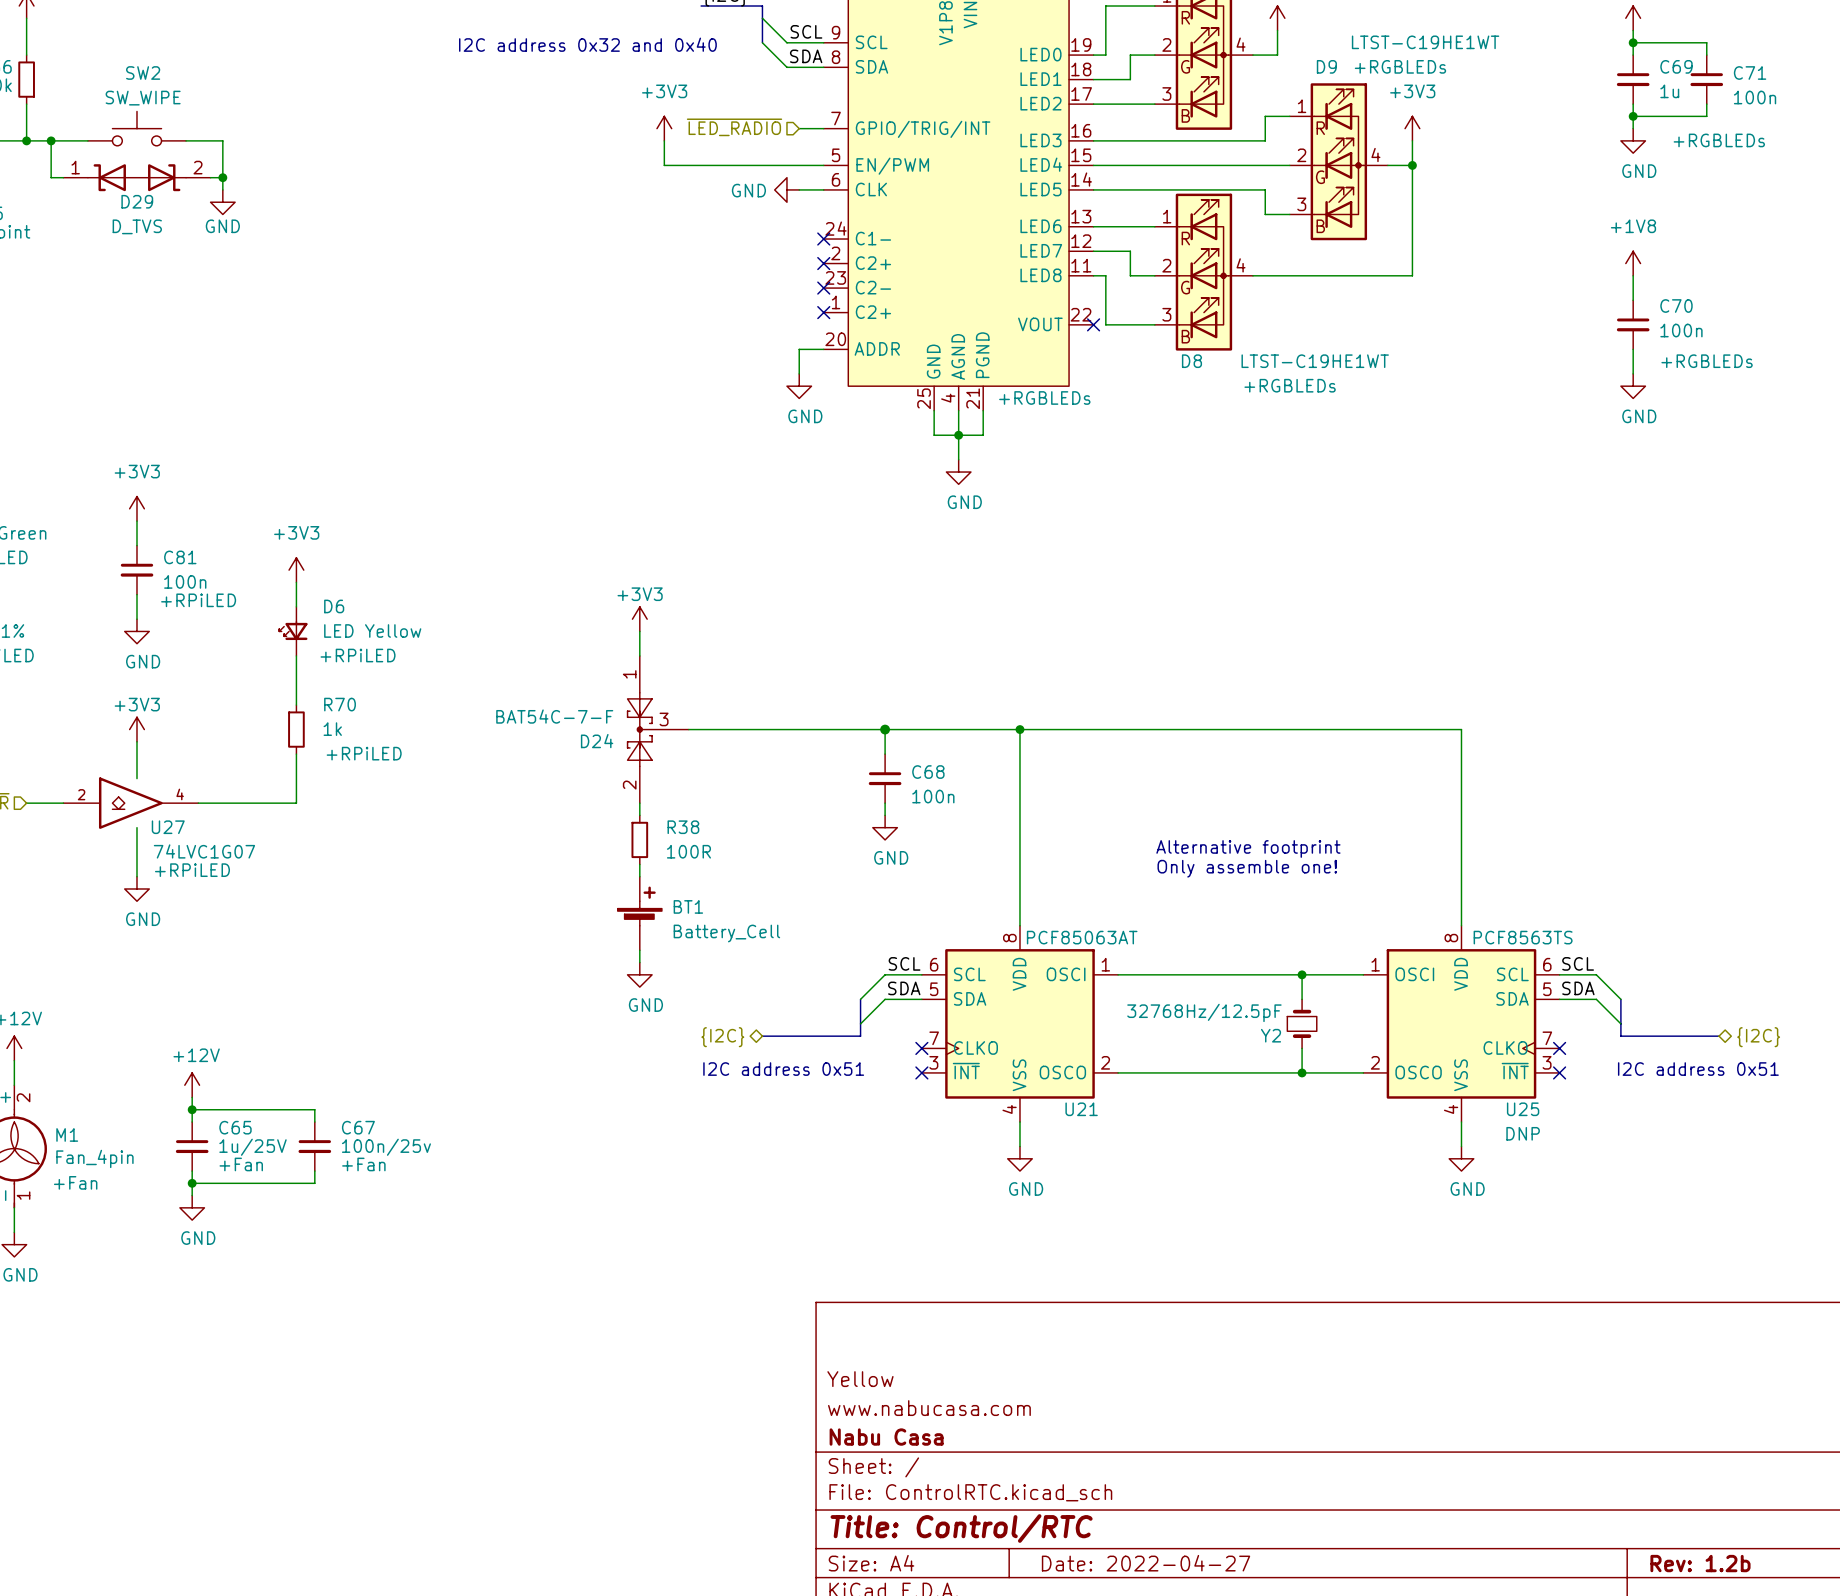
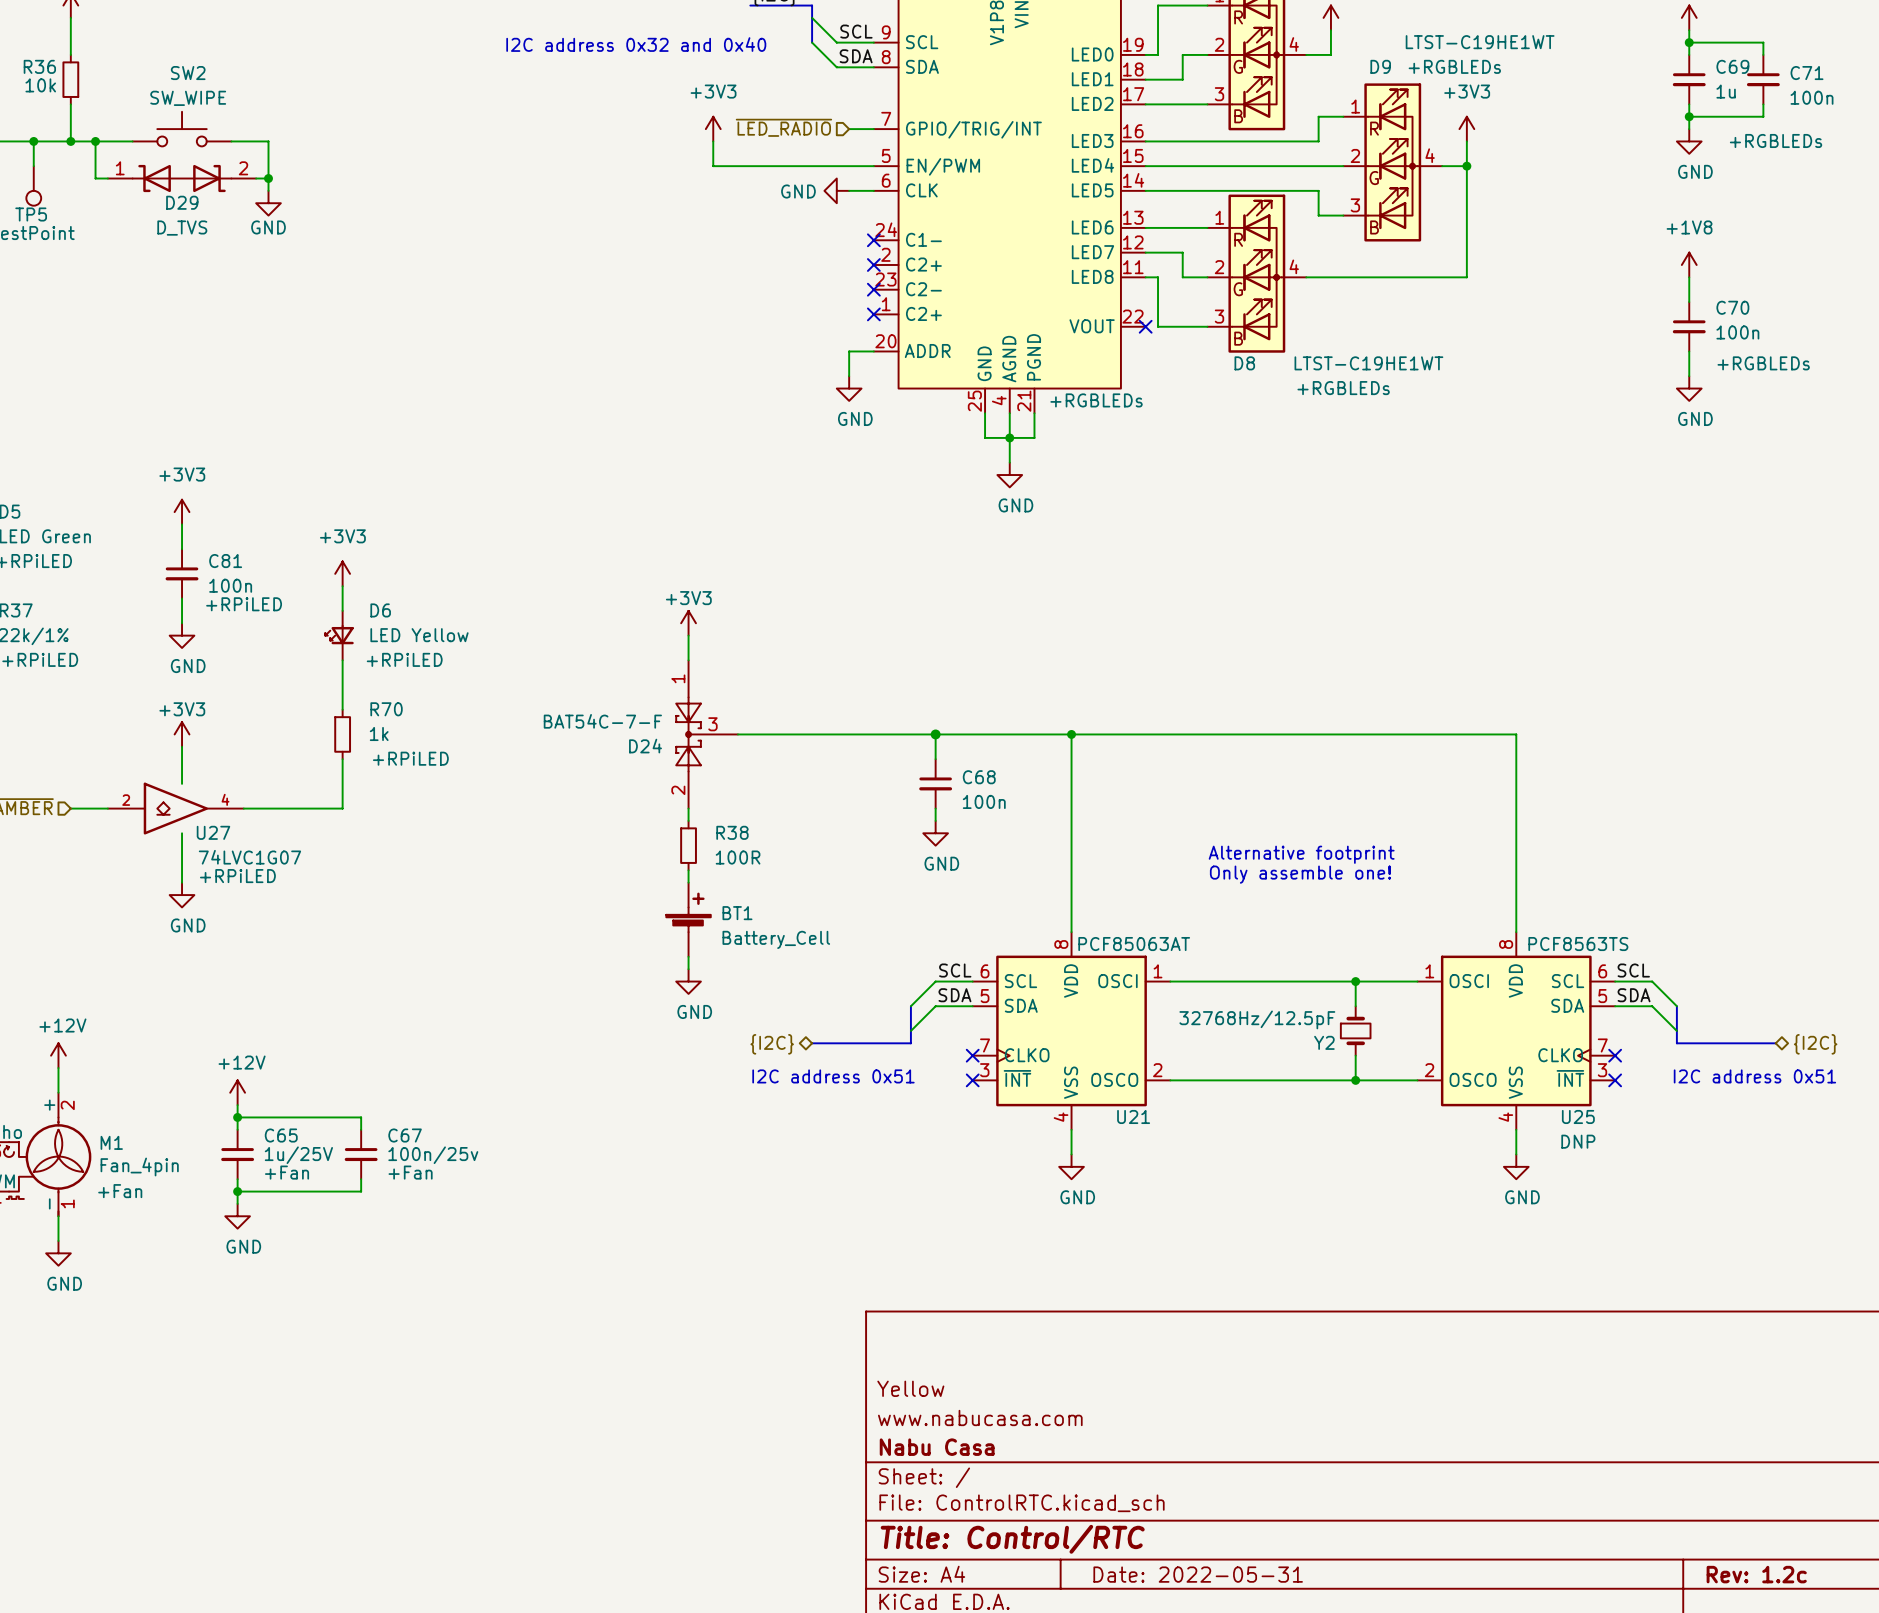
title block: Date: 2022-04-27 (1146, 1563) -> Date: 2022-05-31 (1198, 1574)
title block: Rev: 1.2b (1700, 1563) -> Rev: 1.2c (1756, 1574)

